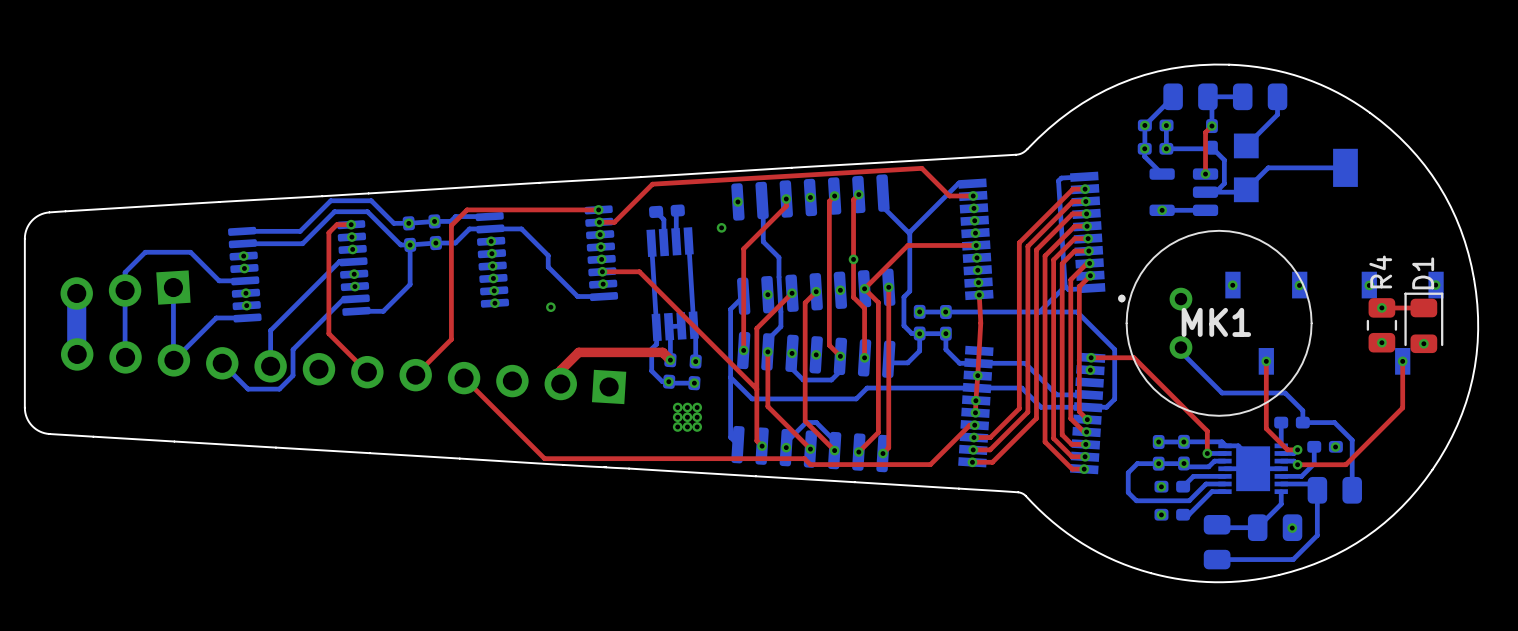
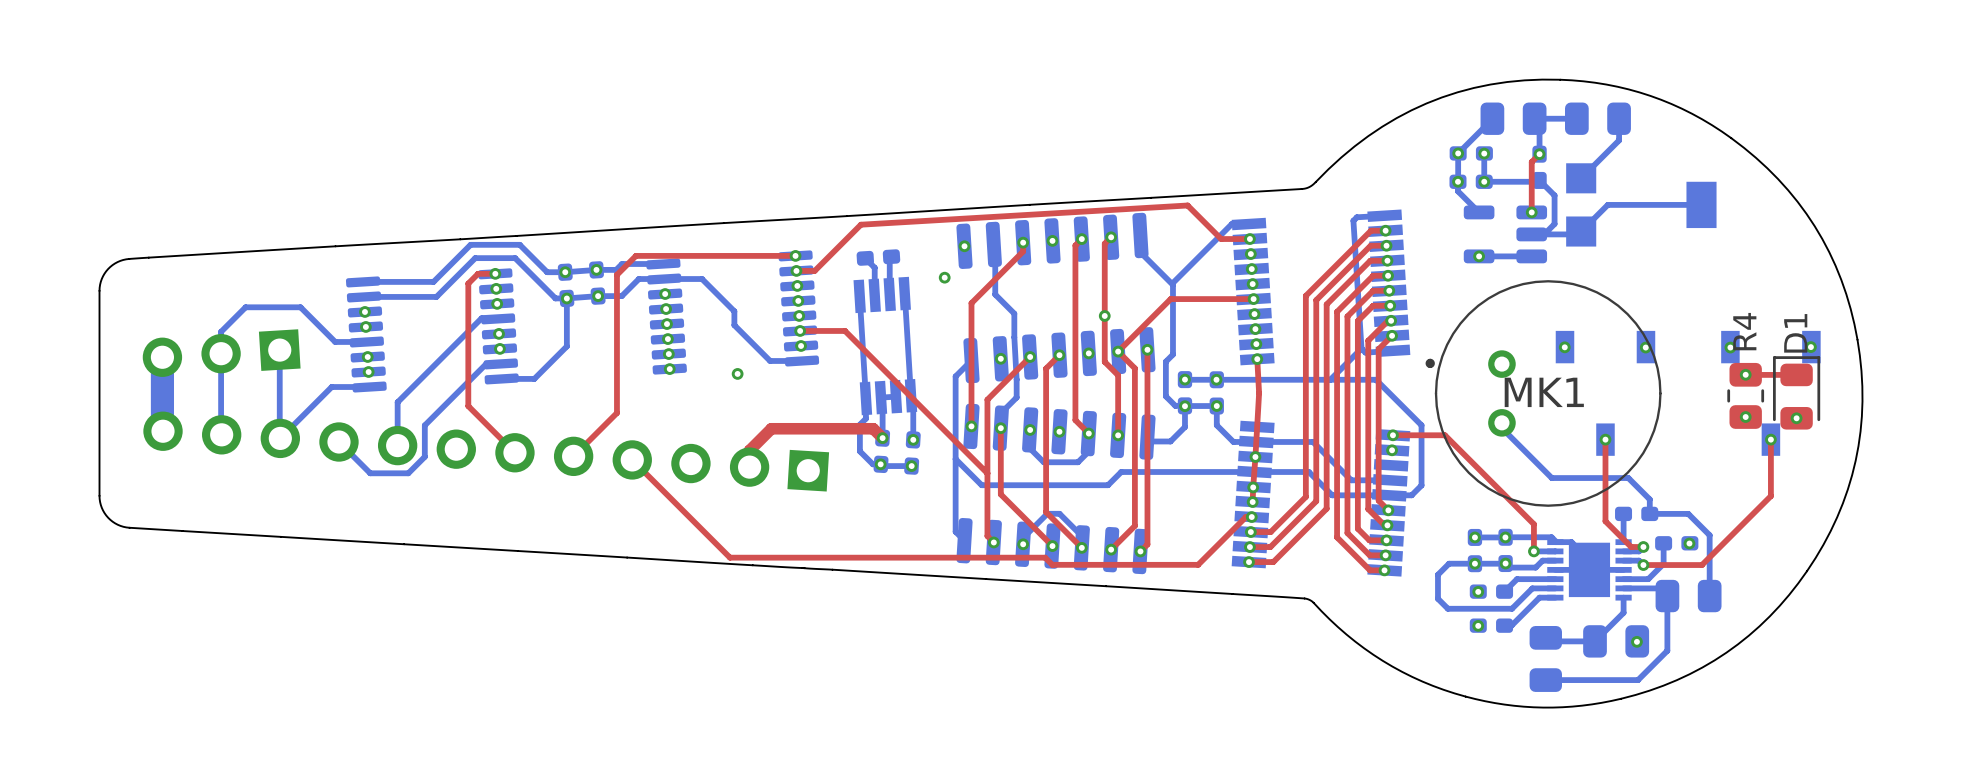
via: (677, 407) -> none
via: (687, 407) -> none
via: (697, 407) -> none
via: (677, 417) -> none
via: (687, 417) -> none
via: (697, 417) -> none
via: (677, 426) -> none
via: (687, 426) -> none
via: (697, 426) -> none

